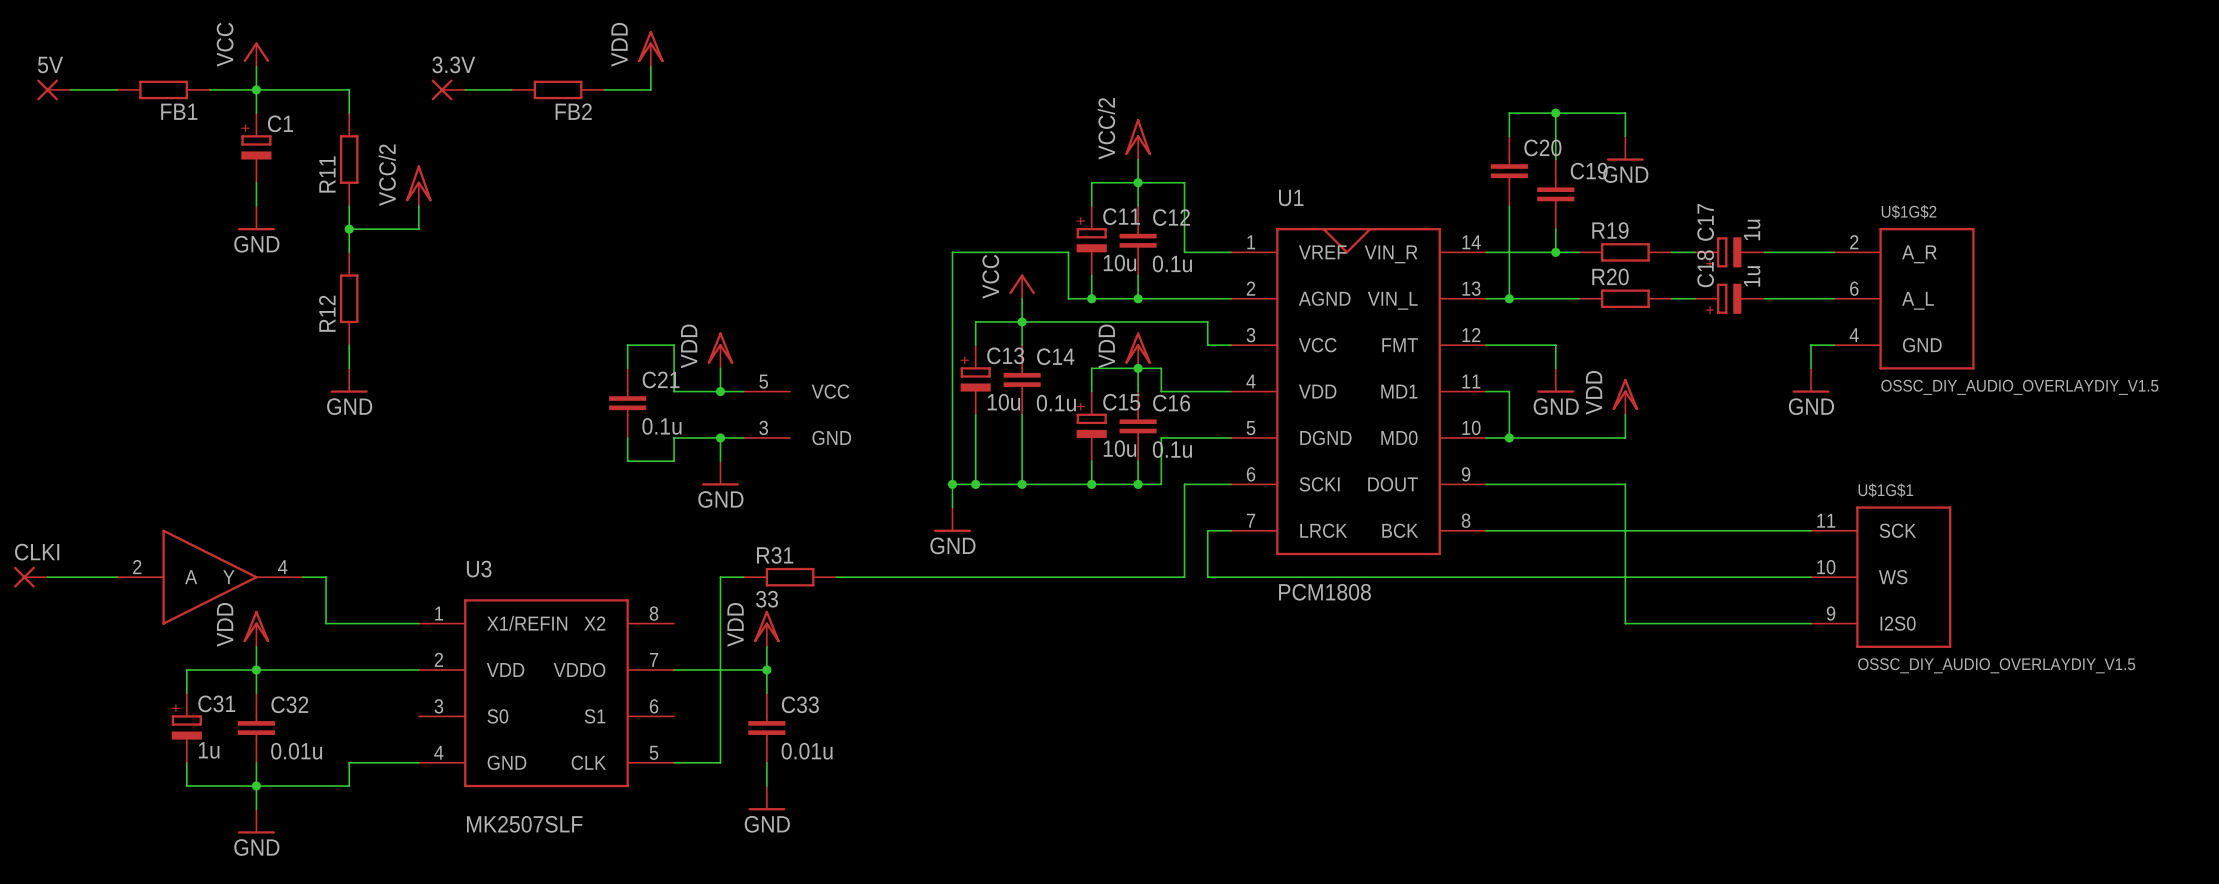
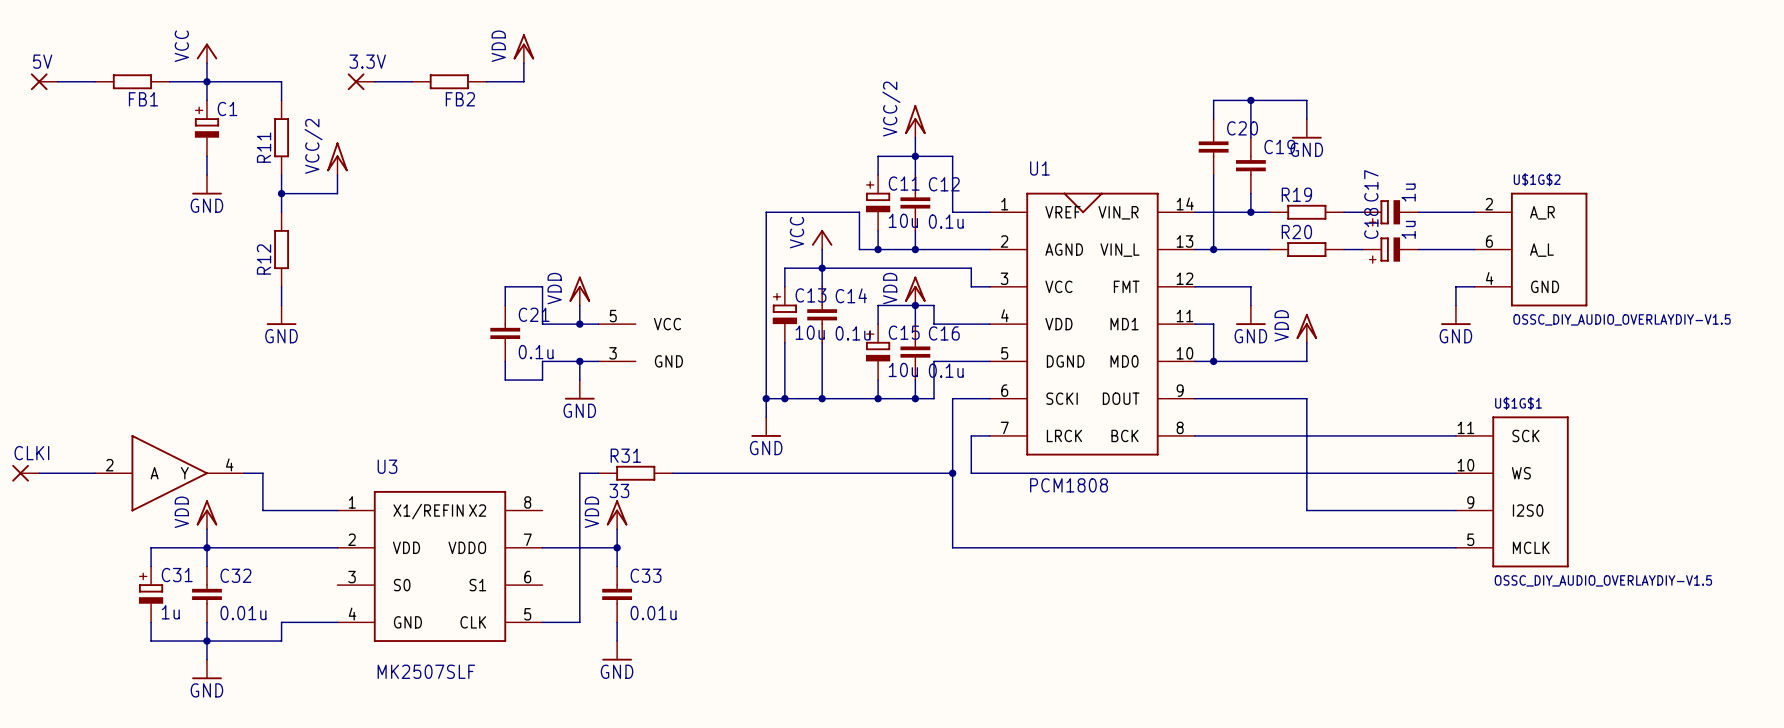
U$1G$2 value: OSSC_DIY_AUDIO_OVERLAYDIY_V1.5 (2019, 387) -> OSSC_DIY_AUDIO_OVERLAYDIY-V1.5 (1622, 319)
U$1G$1 symbol: [1810, 506, 1952, 648] -> [1455, 416, 1569, 568]
wire: none -> (952, 473) (952, 547) (1455, 547)
junction: none -> (952, 473)
U$1G$1 value: OSSC_DIY_AUDIO_OVERLAYDIY_V1.5 (1996, 665) -> OSSC_DIY_AUDIO_OVERLAYDIY-V1.5 (1603, 580)

